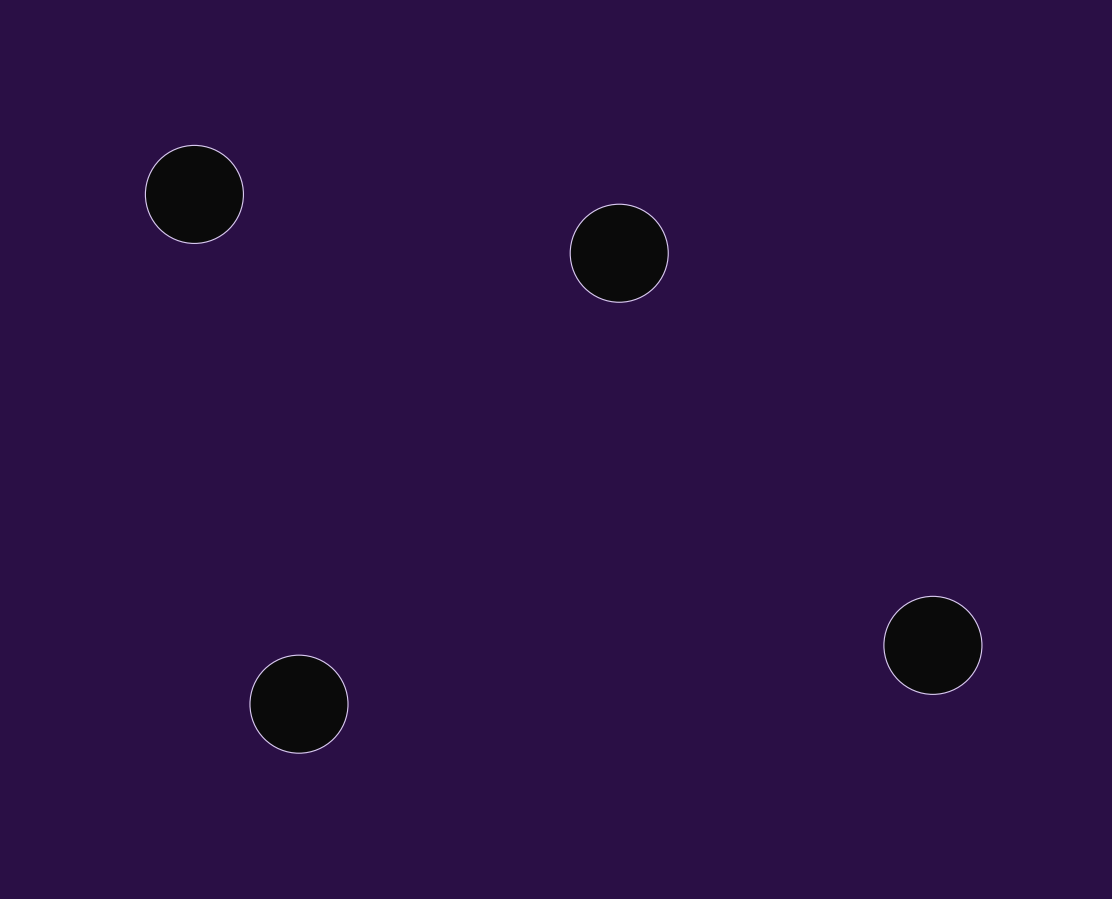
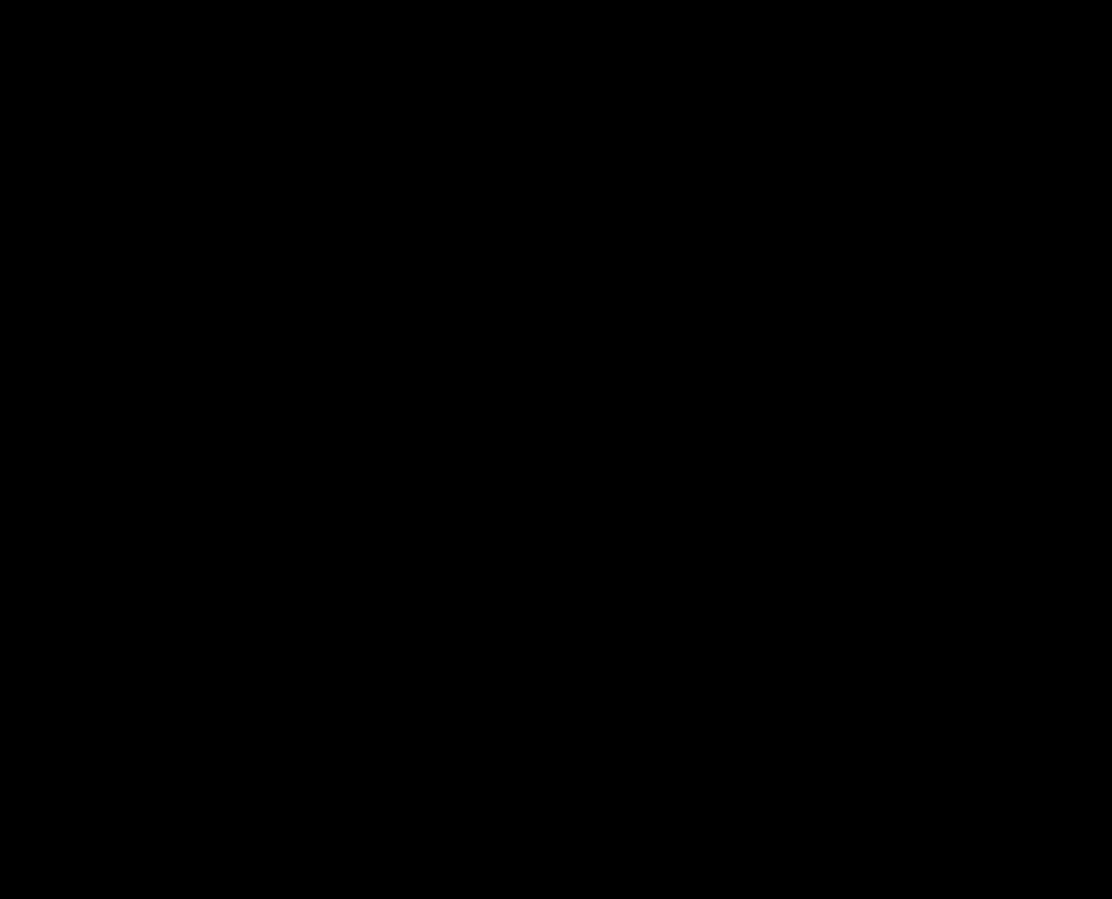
part: (194, 194) -> none
part: (619, 253) -> none
part: (932, 645) -> none
part: (298, 704) -> none

